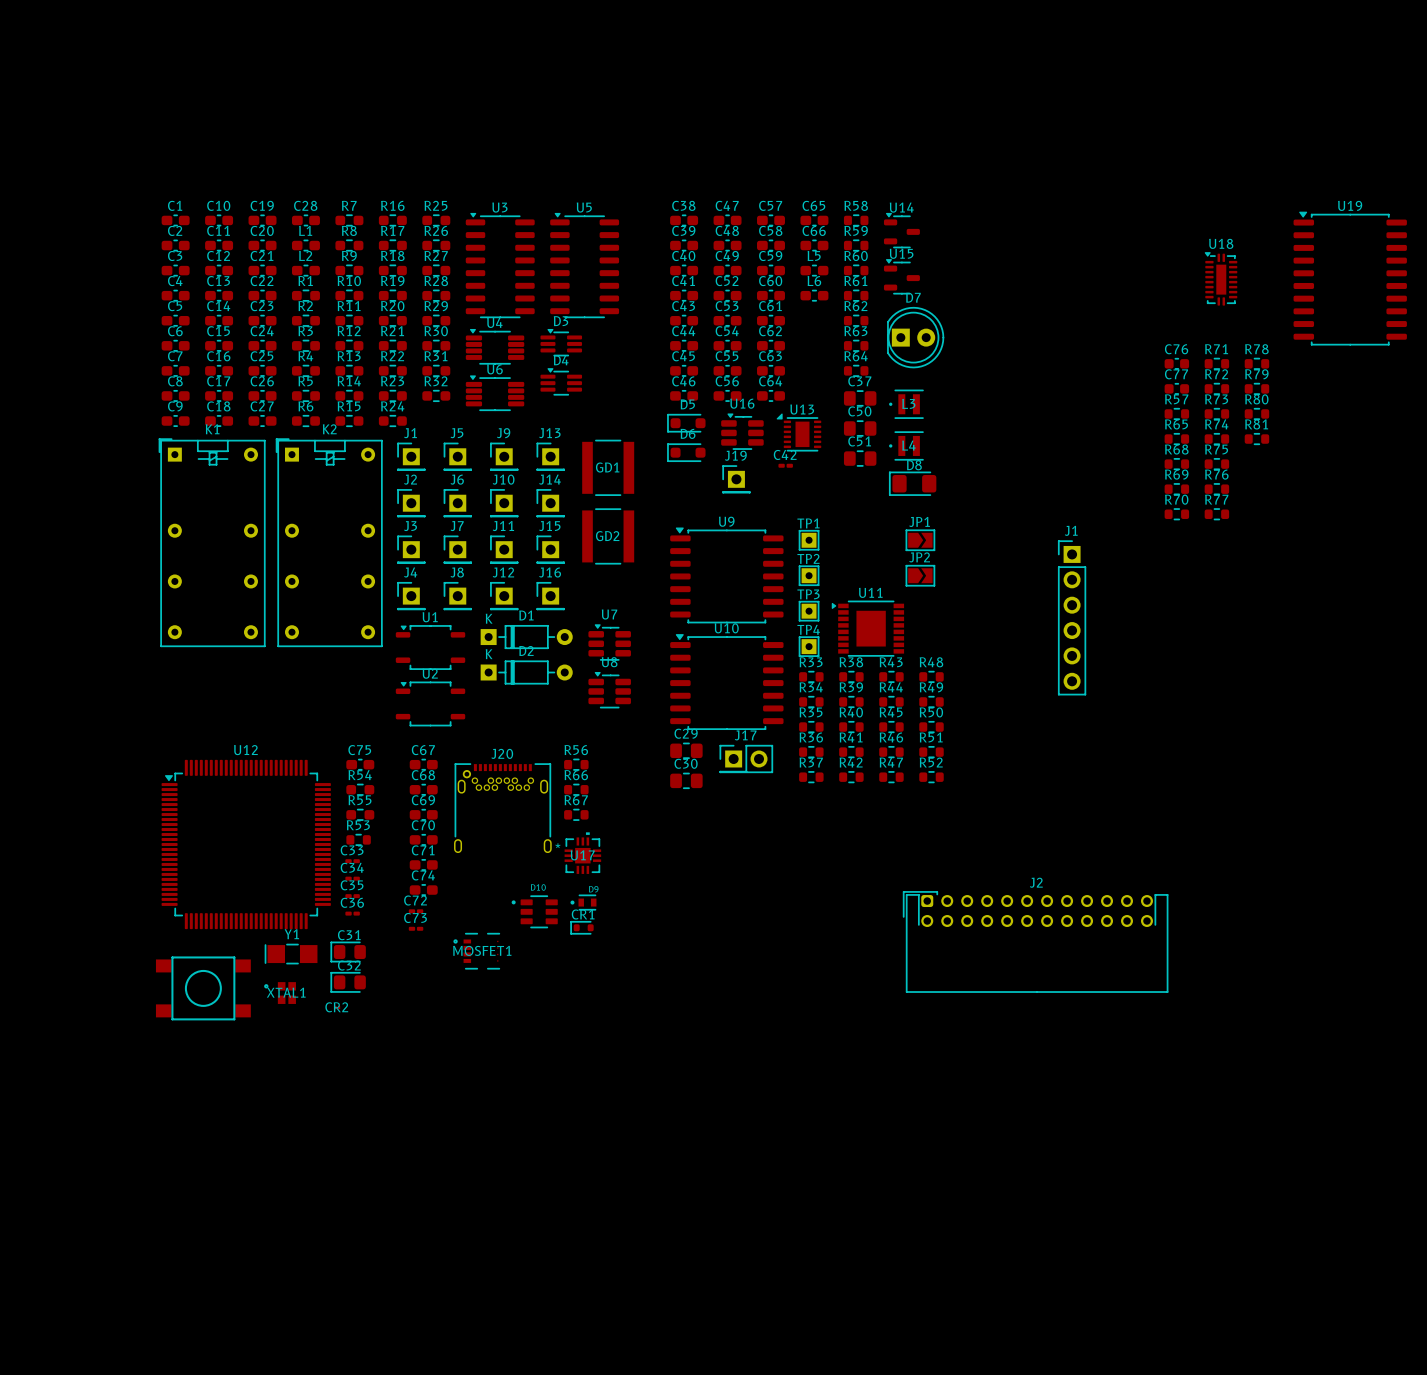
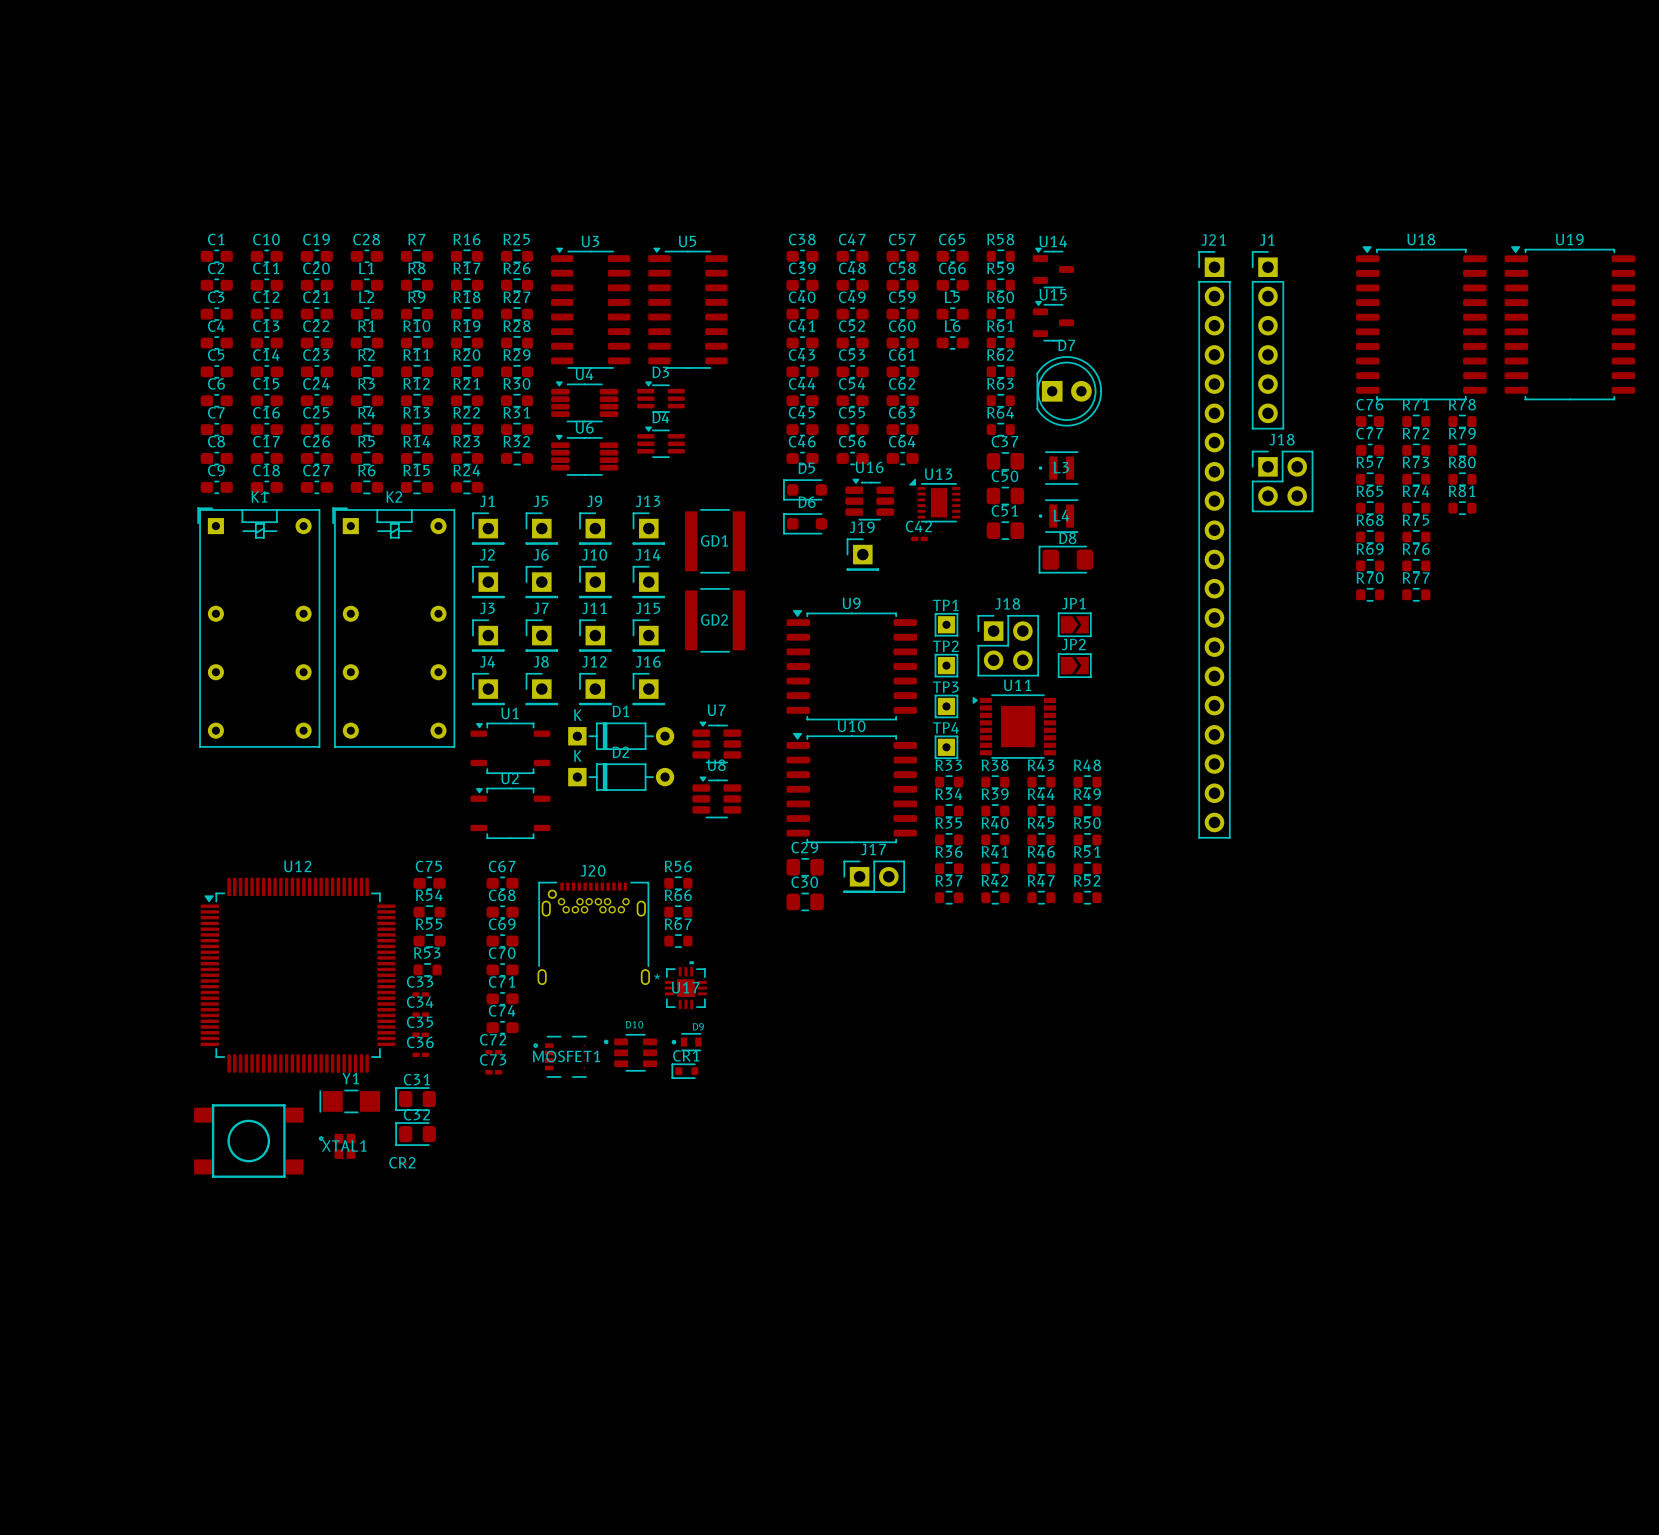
U18 name position: U18 (1221, 243) -> U18 (1421, 239)
U18 footprint: [1204, 252, 1238, 306] -> [1356, 246, 1487, 401]
J1: none -> (1267, 340)
J18: none -> (1282, 481)
J21: none -> (1214, 544)
J18: none -> (1008, 645)
J1: (1072, 617) -> none
J2: (1035, 941) -> none
MOSFET1 position: (476, 951) -> (560, 1056)

